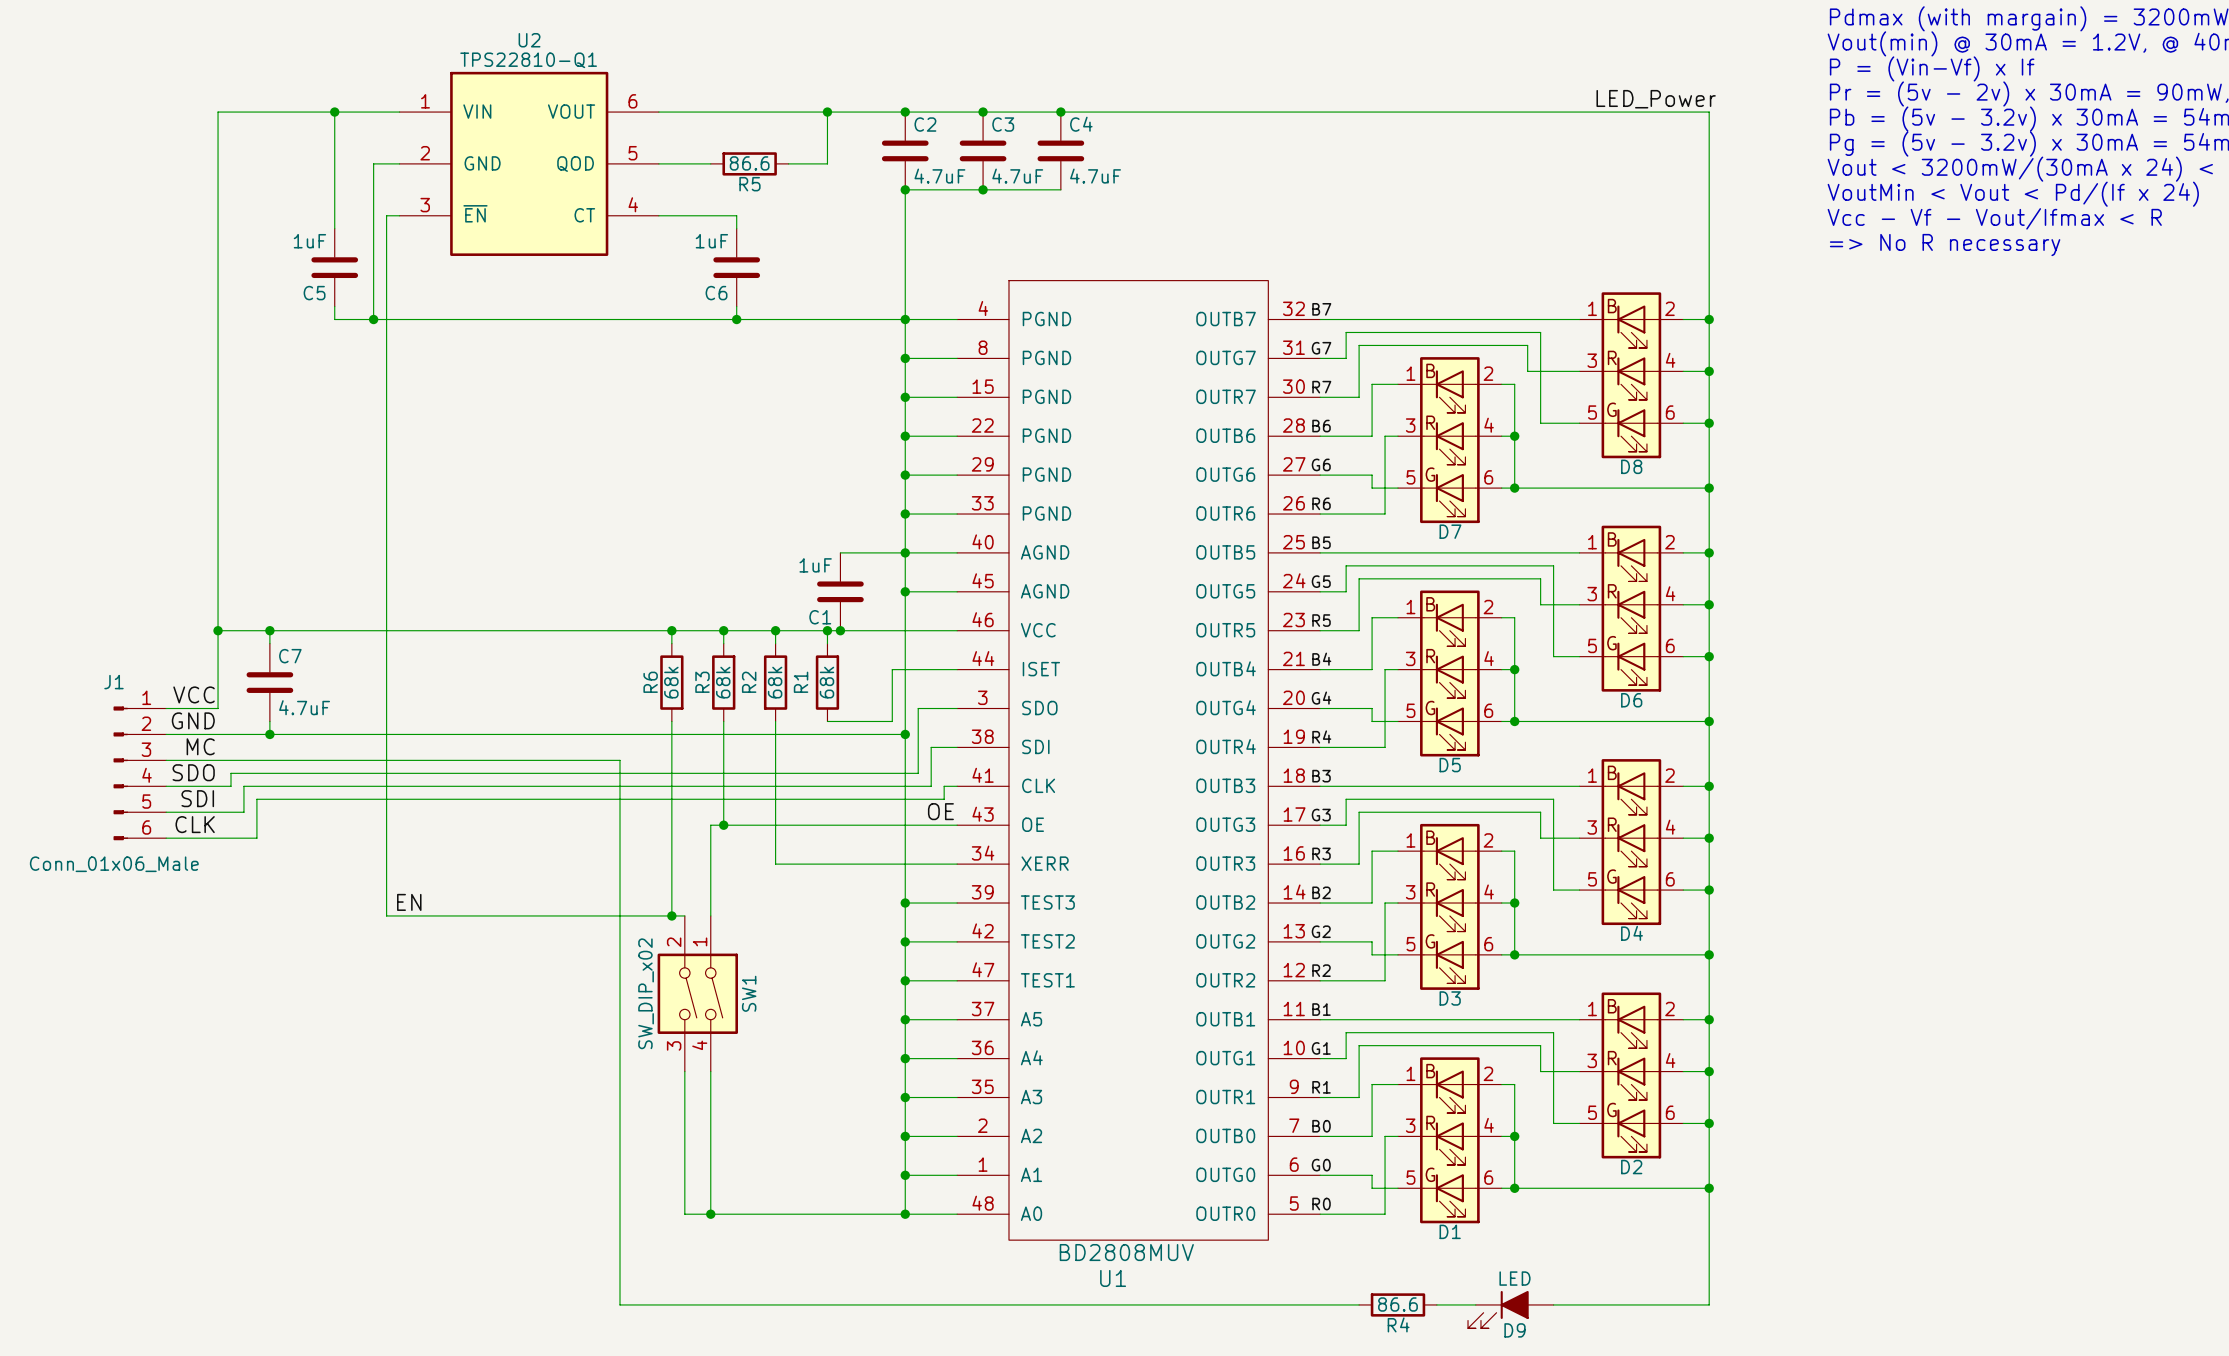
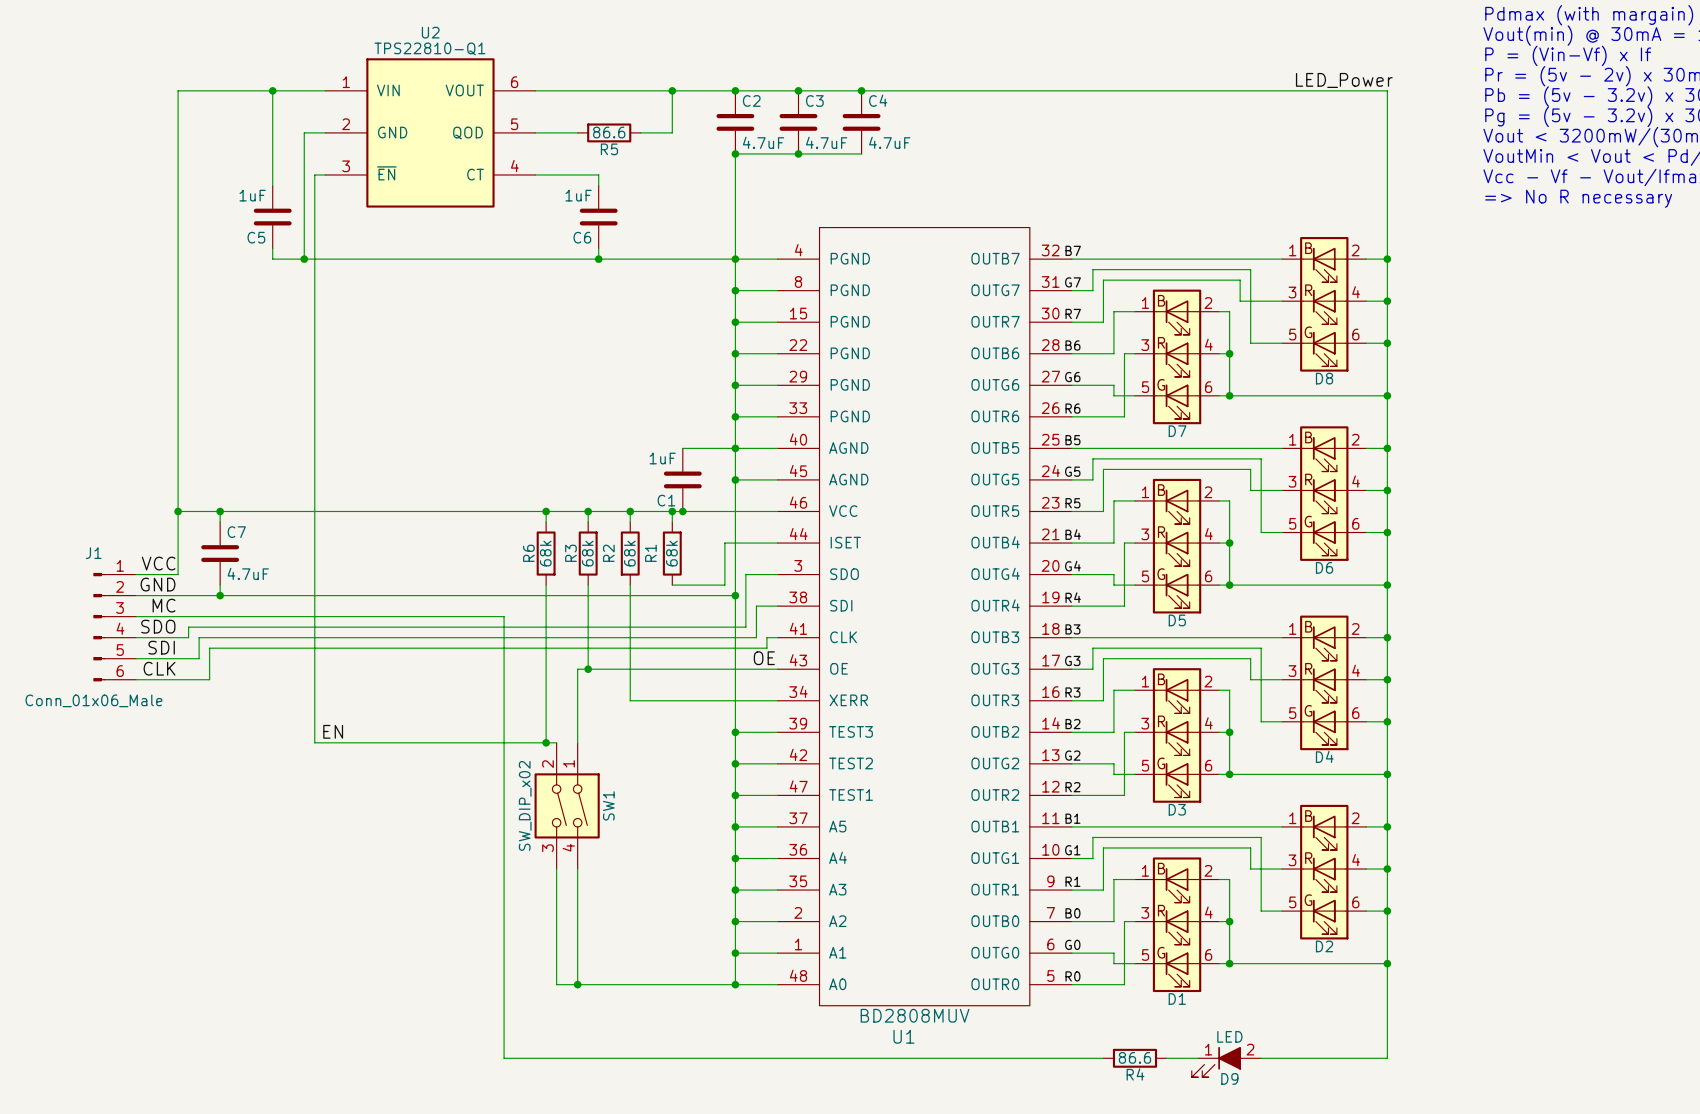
D9 pin number: none -> 1 (1208, 1049)
D9 pin number: none -> 2 (1250, 1049)

